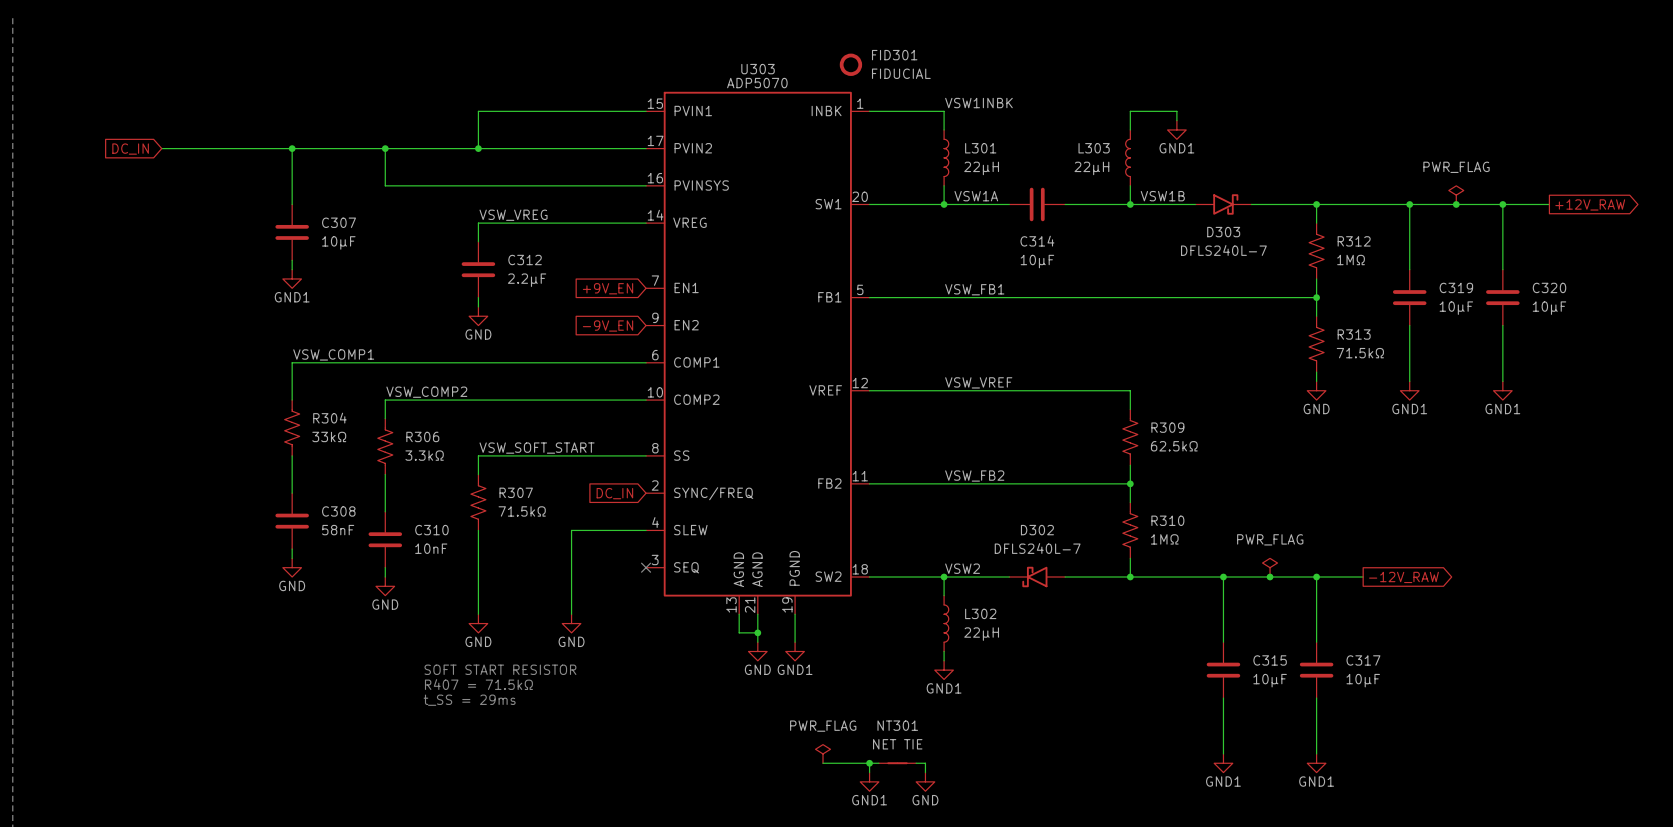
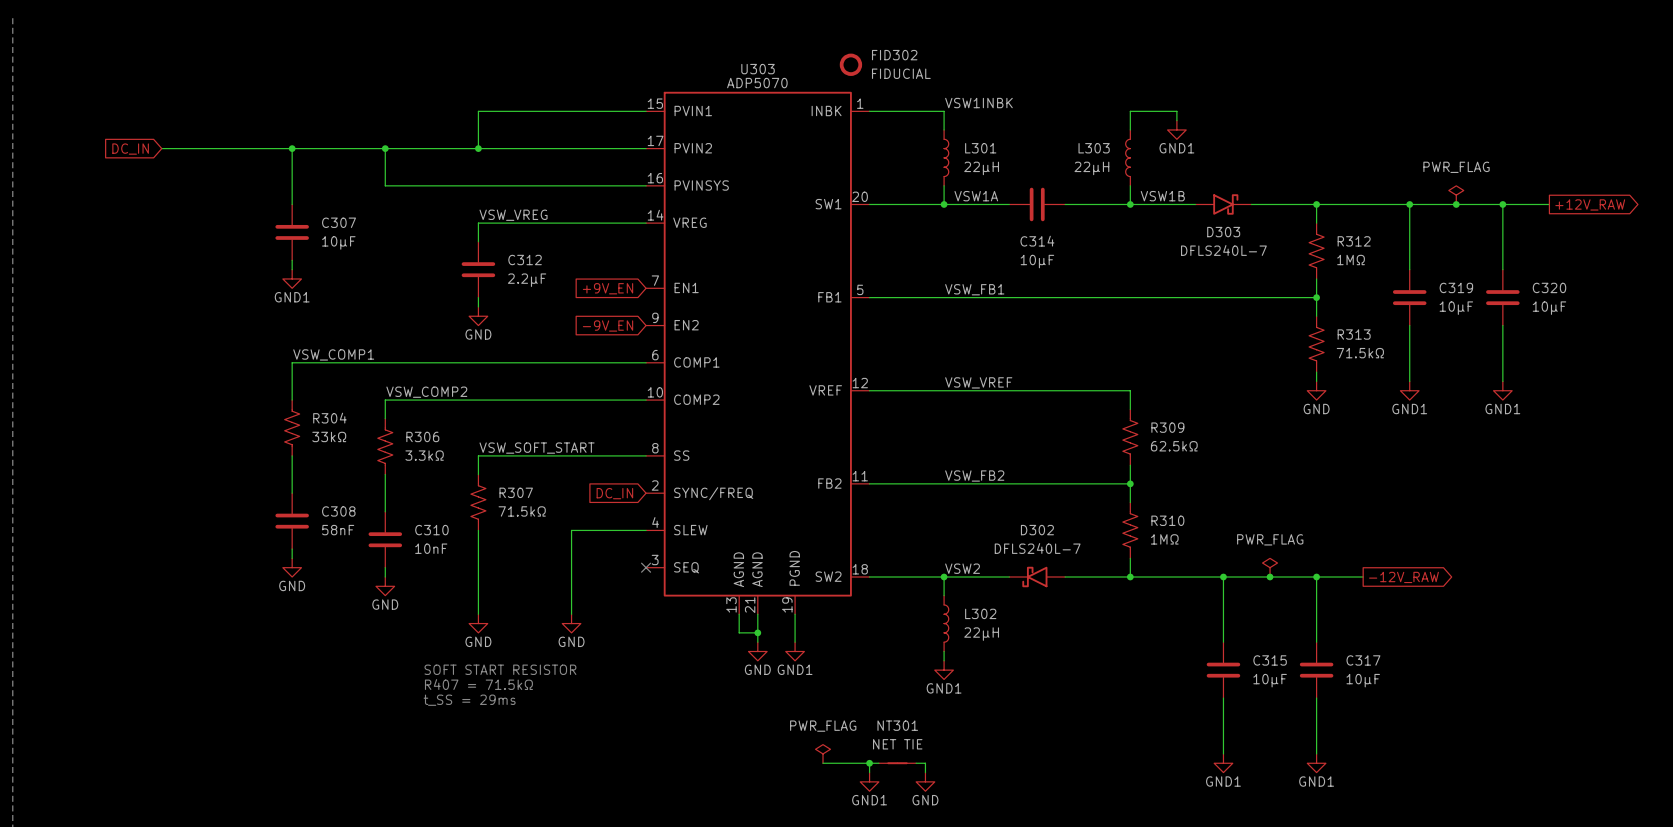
FID301 name: FID301 (894, 55) -> FID302 (894, 55)

